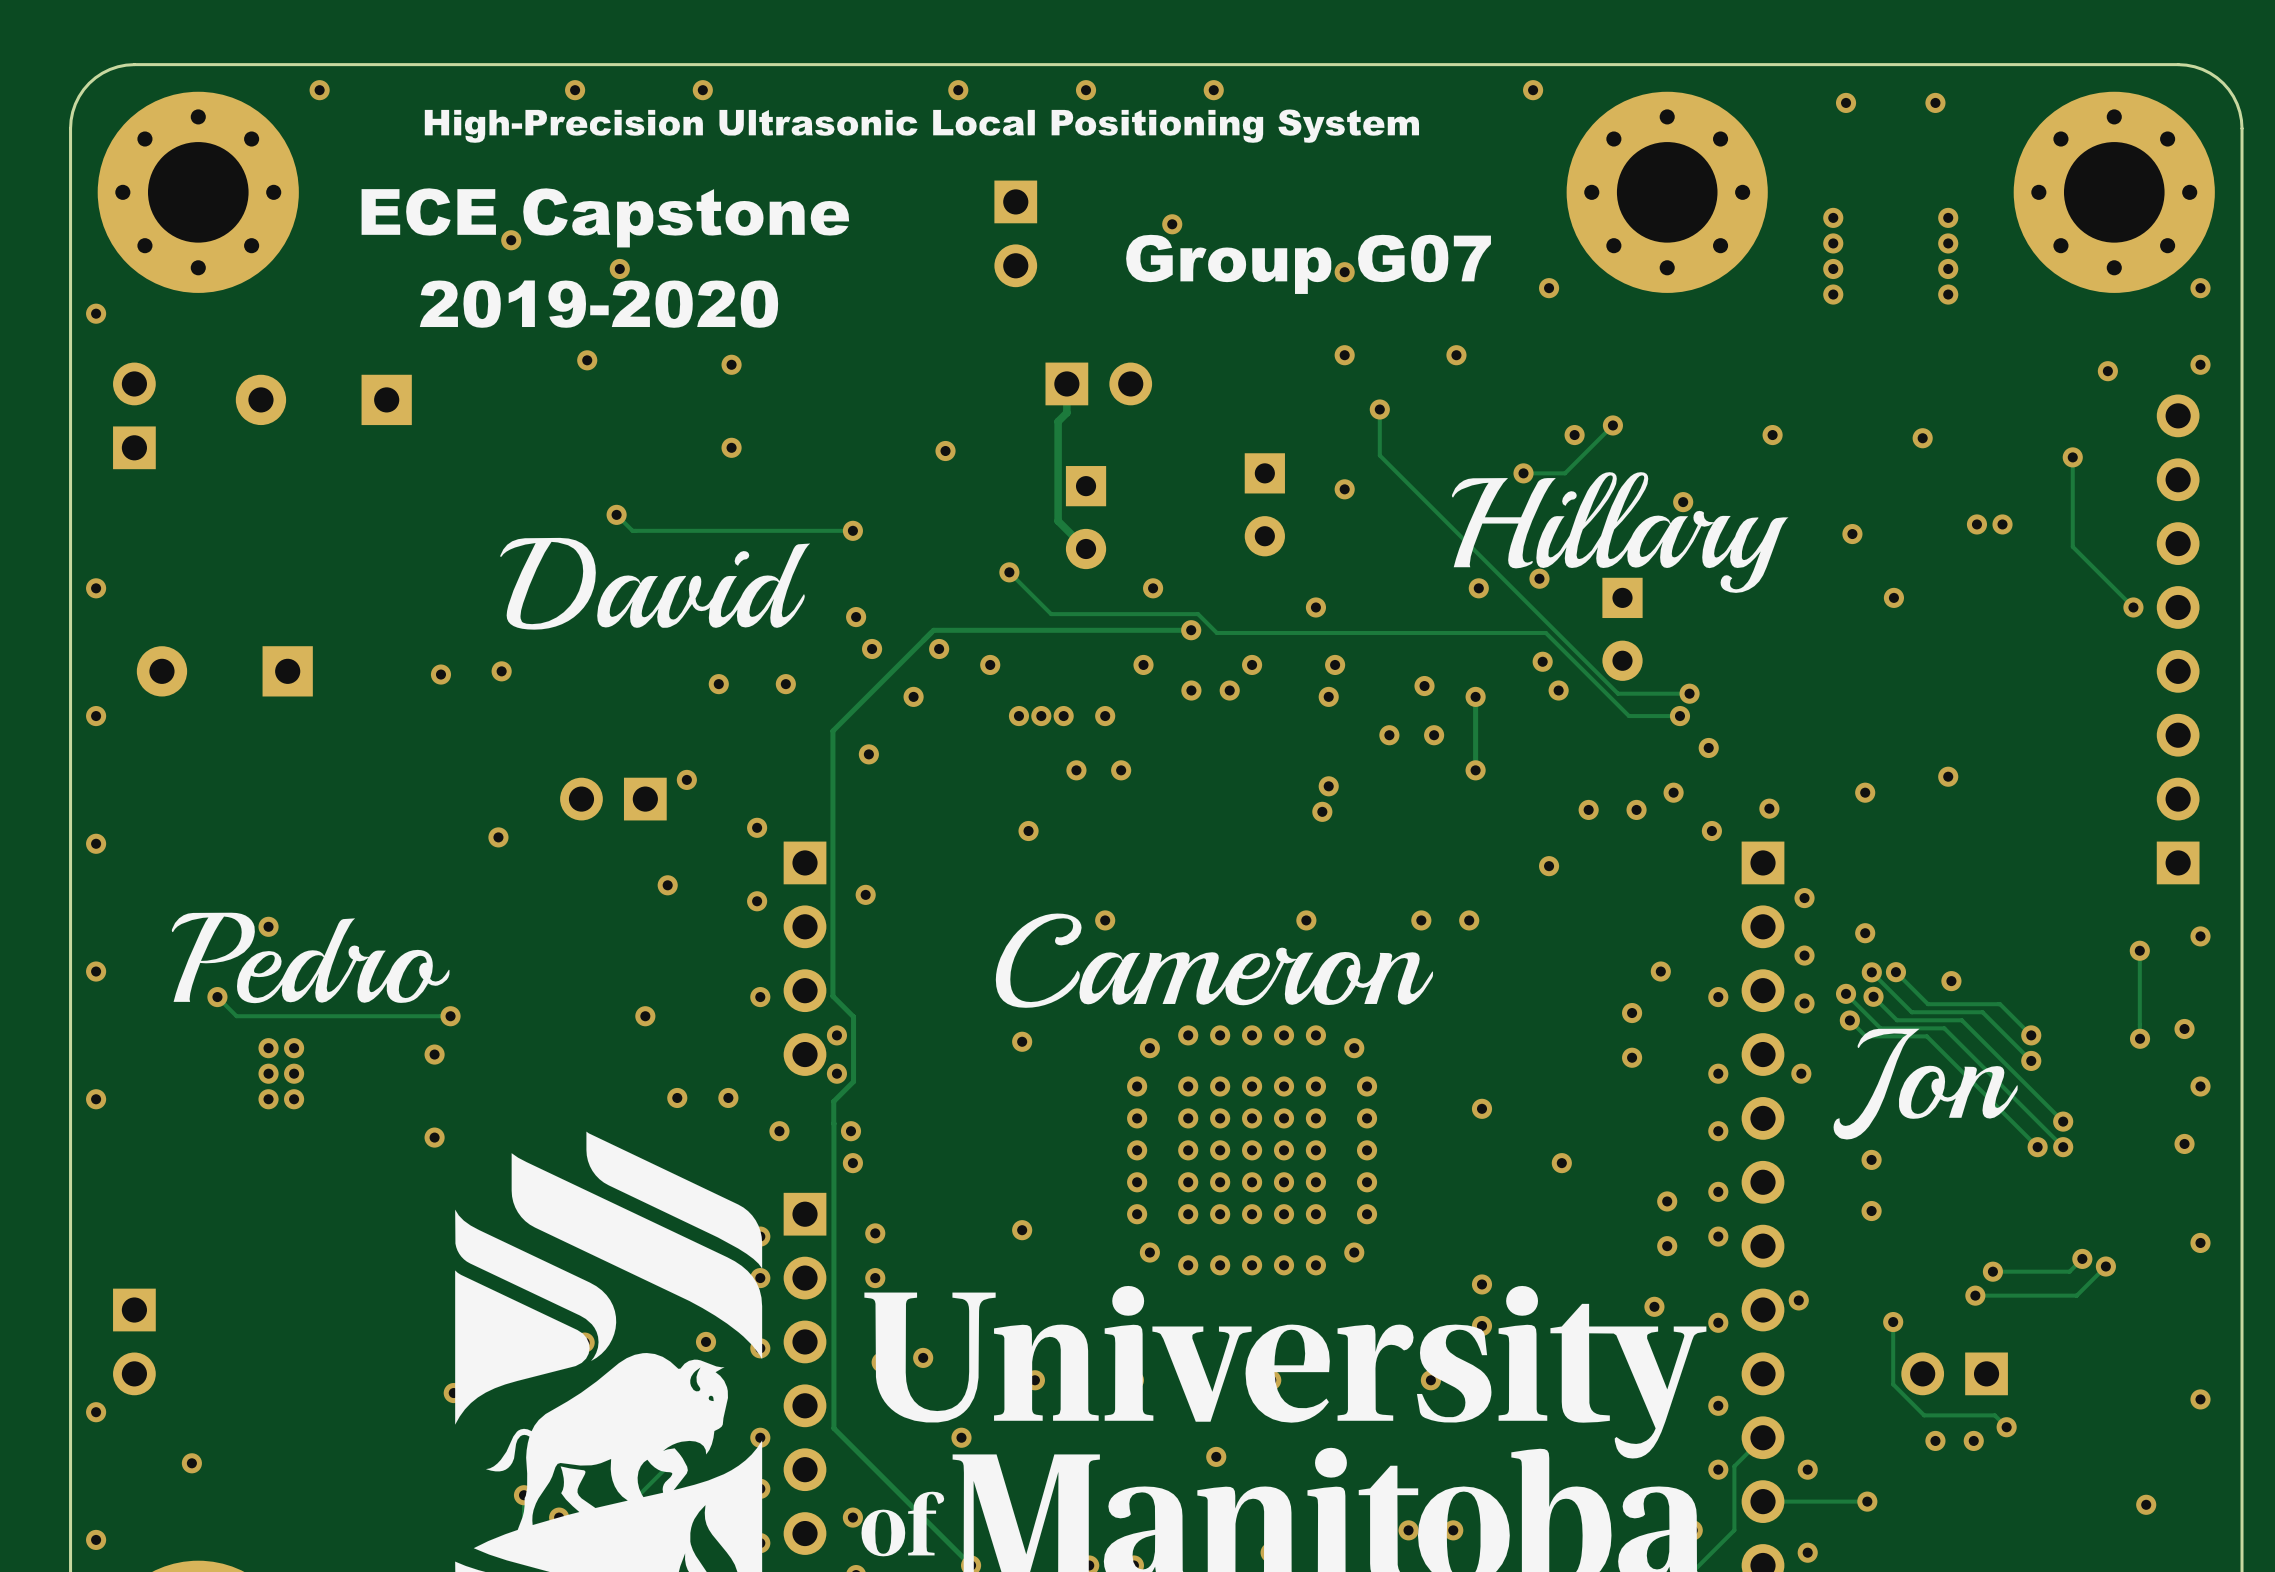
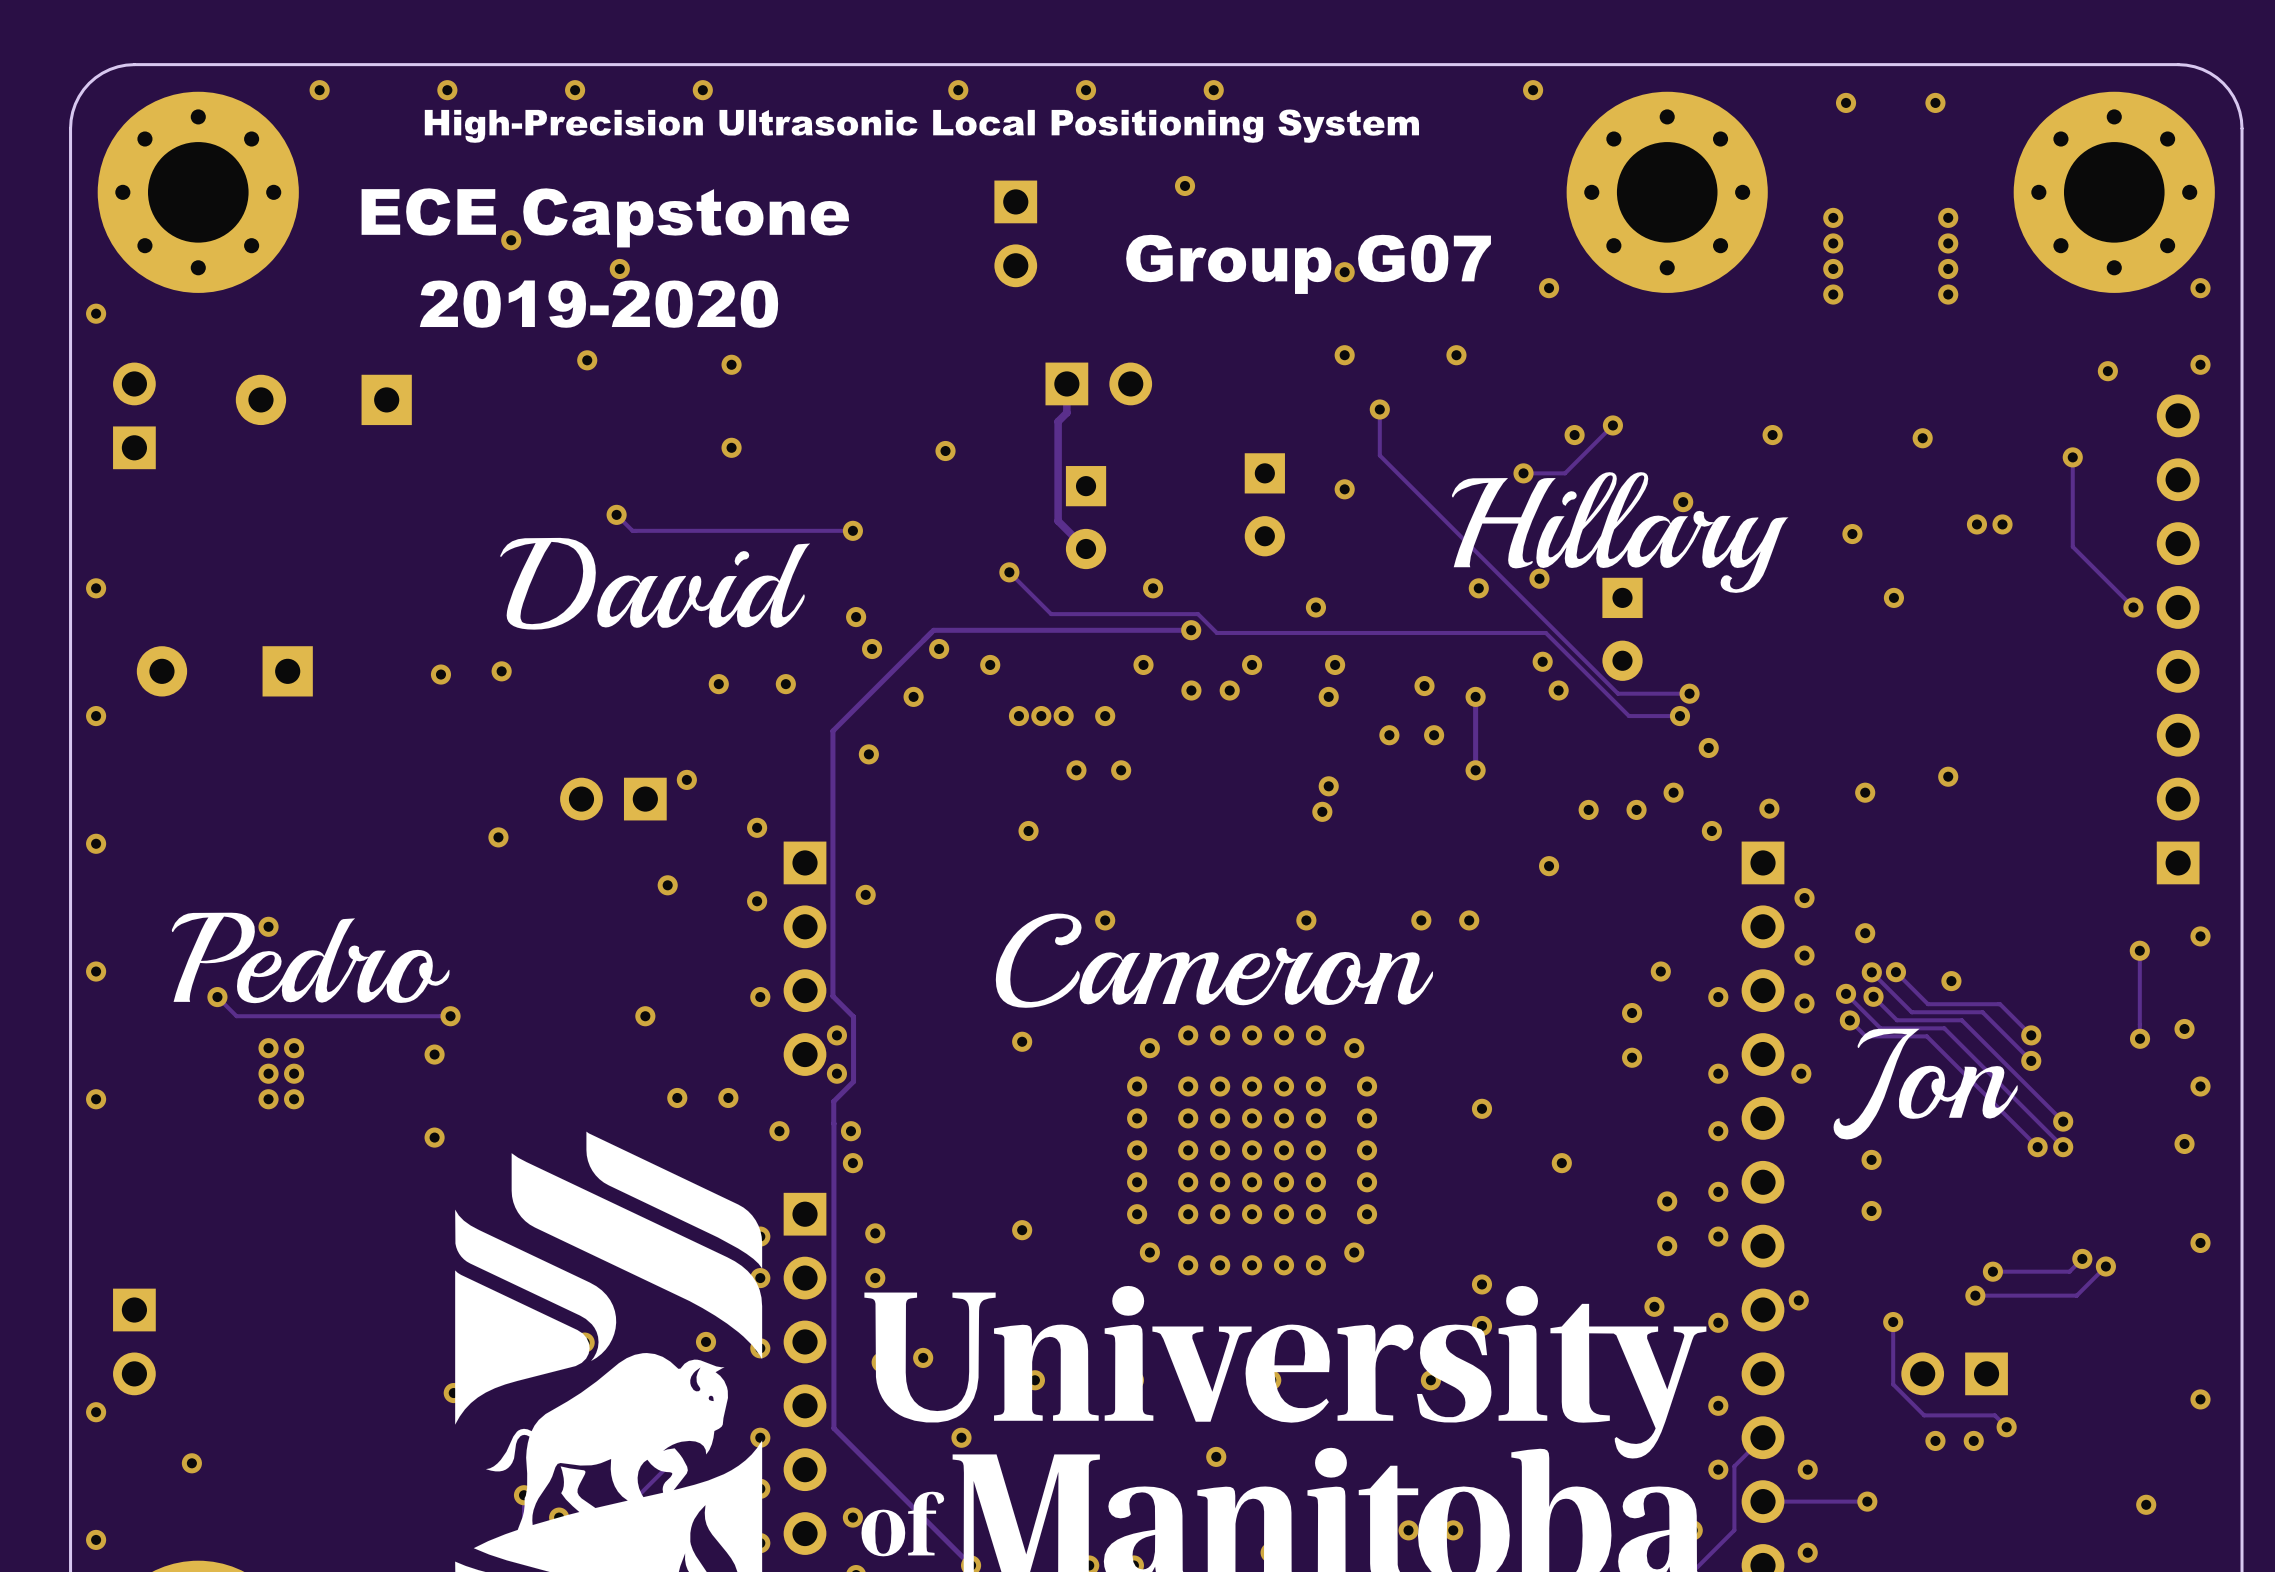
via: none -> (447, 90)
via position: (1172, 224) -> (1185, 185)

